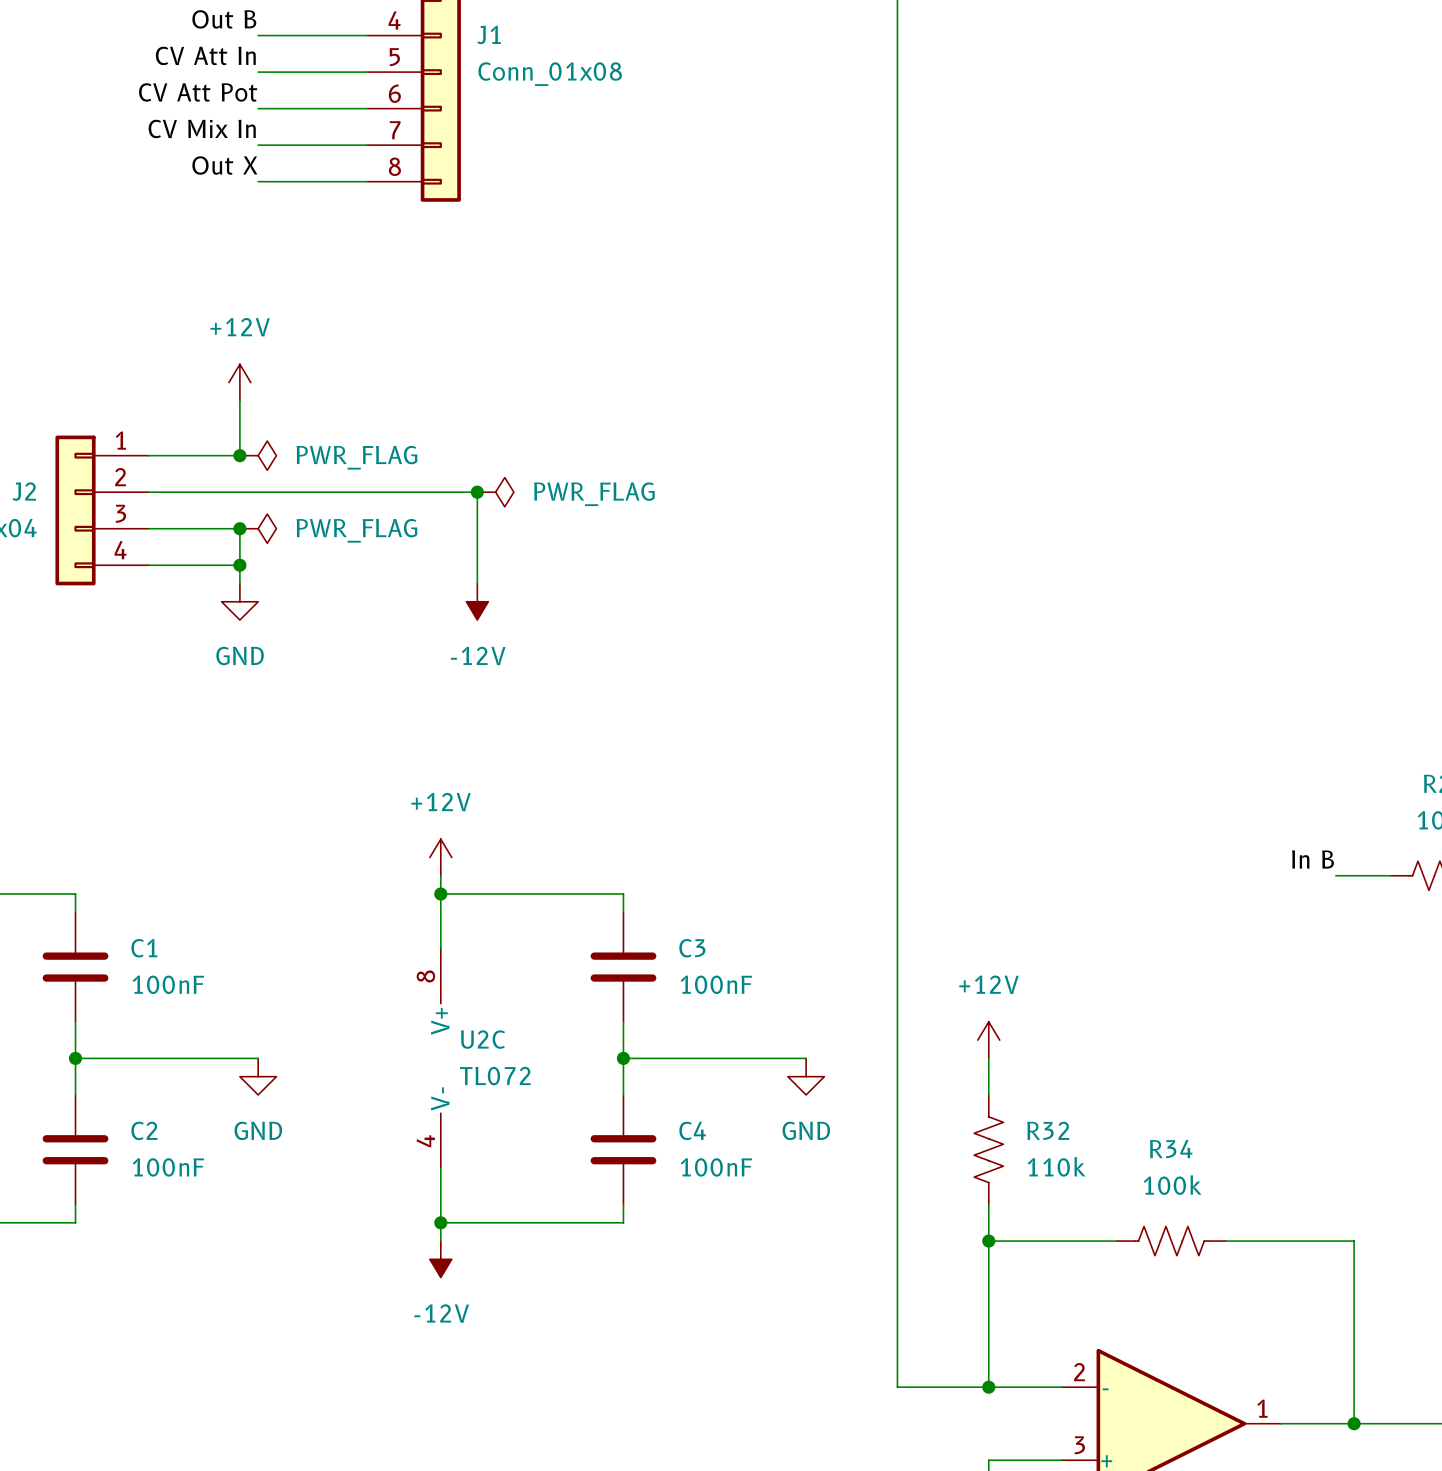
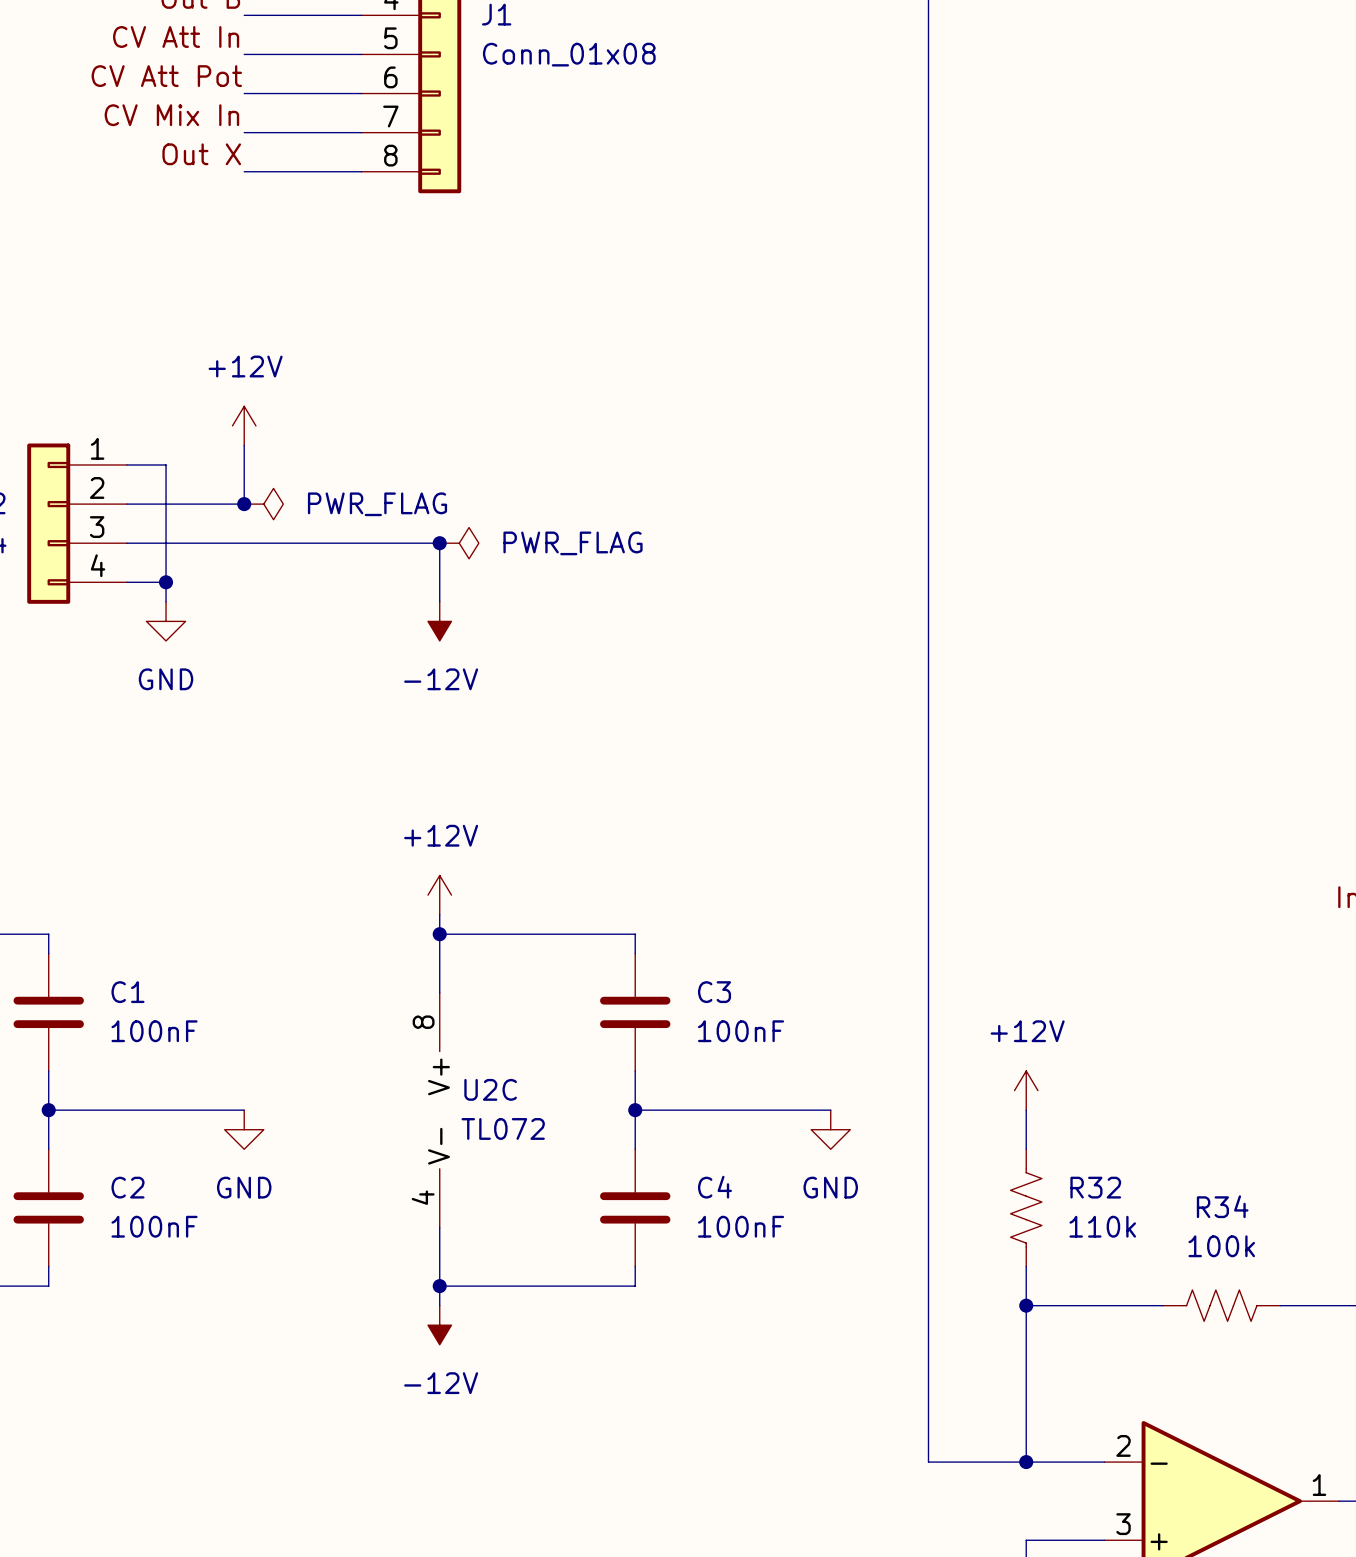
power symbol position: +12V (239, 382) -> +12V (244, 425)
wire: (239, 400) (239, 455) (185, 455) -> (166, 601) (166, 464)
junction: (239, 455) -> none
power symbol: PWR_FLAG (258, 455) -> none
wire: (258, 492) (477, 492) (477, 583) -> (244, 504) (244, 445)
junction: none -> (244, 504)
power symbol: none -> PWR_FLAG (263, 504)
junction position: (477, 492) -> (439, 543)
power symbol position: PWR_FLAG (495, 492) -> PWR_FLAG (459, 543)
wire: (239, 528) (239, 583) -> (224, 543) (439, 543) (439, 601)
junction: (239, 528) -> none
power symbol: PWR_FLAG (258, 528) -> none
wire: (185, 565) (239, 565) -> none
junction: none -> (166, 582)
junction: (239, 565) -> none
power symbol position: GND (239, 601) -> GND (166, 621)
power symbol position: -12V (477, 601) -> -12V (439, 621)

